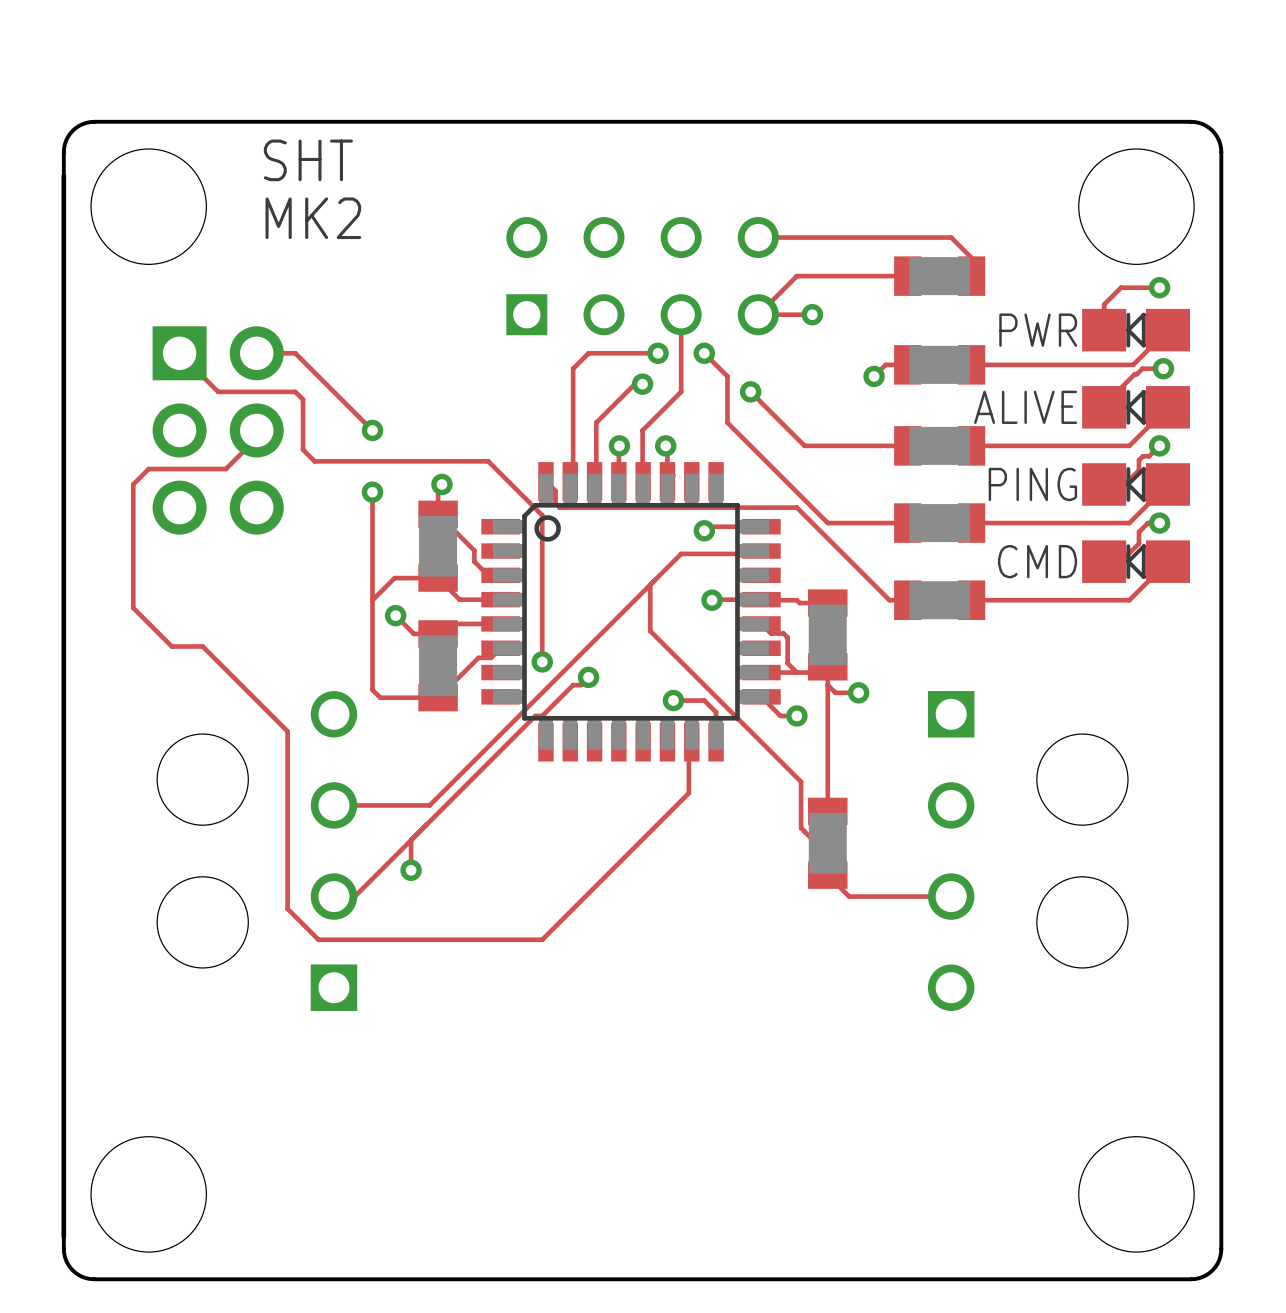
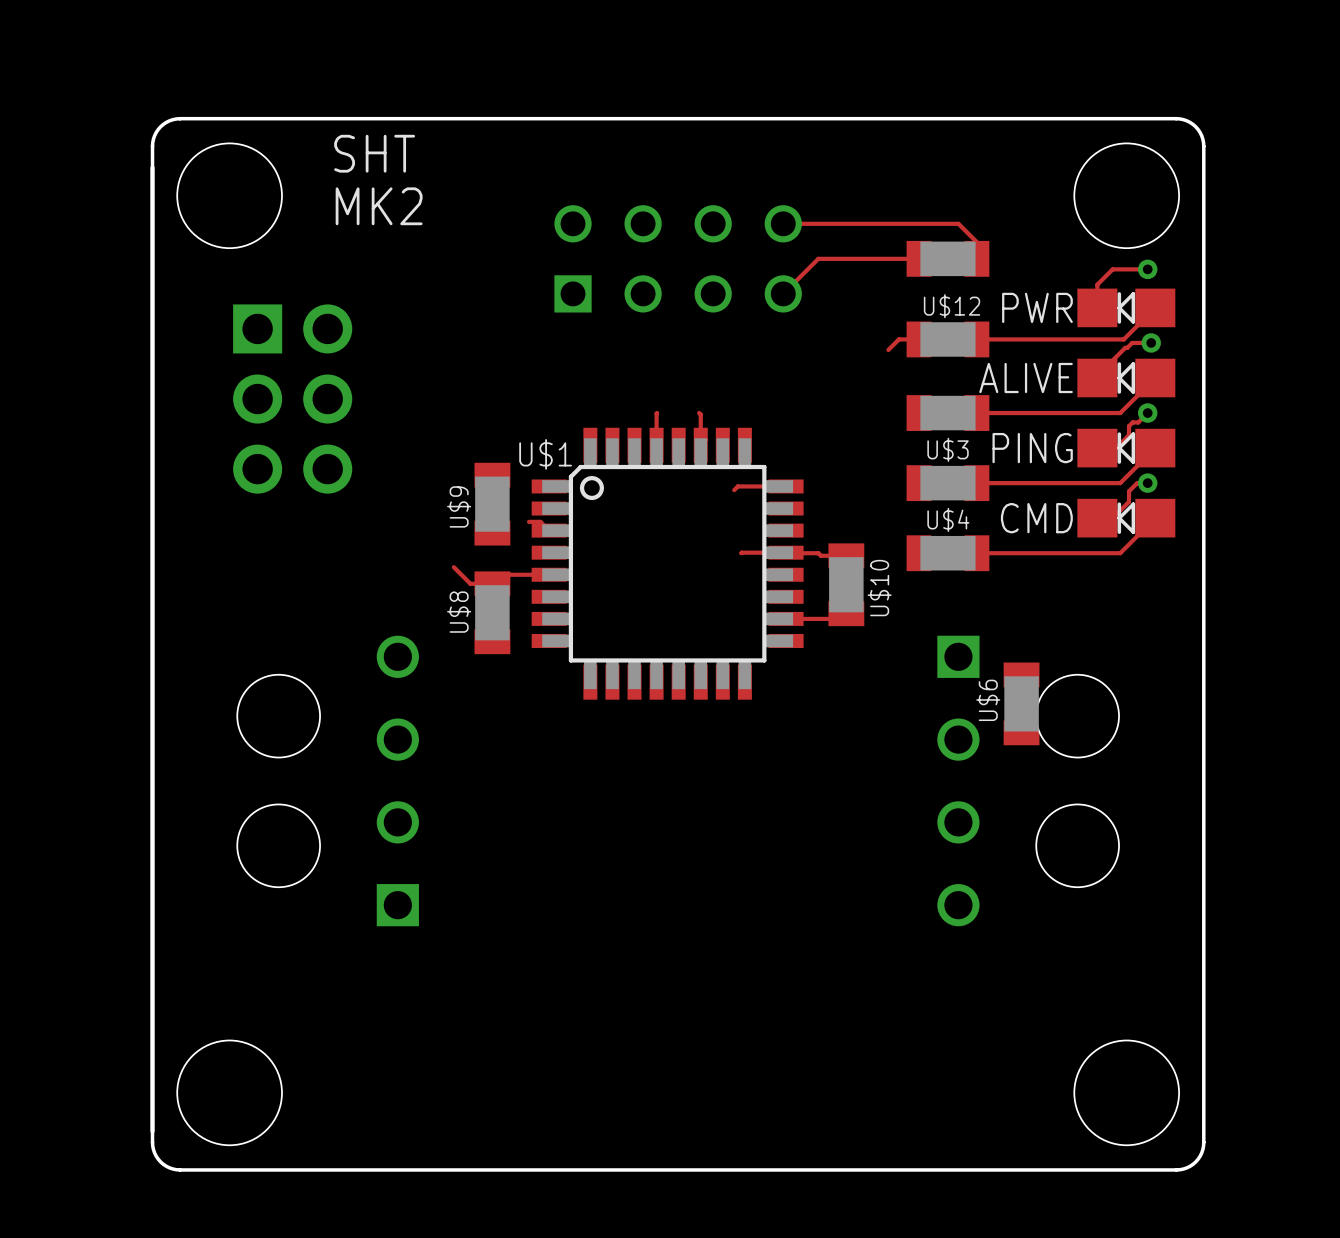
track: (681, 314) (681, 391) (642, 430) (643, 481) -> none
track: (758, 314) (812, 314) -> none
via: (812, 314) -> none
U$12 name: none -> U$12 (952, 306)
track: (179, 353) (218, 391) (295, 391) (303, 399) (303, 449) (314, 461) (488, 461) (542, 515) (542, 661) -> none
track: (256, 353) (295, 353) (372, 430) -> none
track: (658, 353) (588, 353) (573, 368) (573, 478) (570, 481) -> none
via: (658, 353) -> none
track: (704, 353) (727, 376) (727, 422) (827, 523) (907, 523) -> none
via: (704, 353) -> none
via: (874, 376) -> none
track: (642, 384) (634, 384) (596, 422) (596, 479) (594, 481) -> none
via: (642, 384) -> none
track: (750, 391) (804, 445) (907, 445) -> none
via: (750, 391) -> none
track: (256, 430) (256, 438) (225, 469) (148, 469) (133, 484) (133, 607) (171, 646) (202, 646) (287, 731) (287, 908) (318, 939) (542, 939) (688, 793) (688, 745) (691, 742) -> none
via: (372, 430) -> none
via: (619, 445) -> none
via: (665, 445) -> none
track: (545, 481) (555, 491) (555, 503) (559, 507) (796, 507) (889, 600) (907, 600) -> none
track: (441, 484) (438, 488) (438, 514) (474, 550) (474, 561) (488, 575) (500, 575) -> (529, 521) (540, 521) (549, 530)
via: (441, 484) -> none
U$3 name: none -> U$3 (948, 449)
U$1 name: none -> U$1 (545, 454)
track: (372, 492) (372, 689) (380, 697) (438, 697) (478, 657) (490, 657) (500, 648) -> none
via: (372, 492) -> none
via: (704, 530) -> none
U$9 name: none -> U$9 (459, 506)
track: (761, 551) (758, 553) (681, 553) (429, 805) (333, 805) -> none
U$4 name: none -> U$4 (948, 519)
track: (650, 584) (650, 631) (801, 781) (801, 827) (827, 854) (827, 875) (849, 896) (951, 896) -> none
track: (500, 599) (459, 599) (438, 578) (394, 578) (372, 600) -> none
via: (712, 600) -> none
via: (395, 615) -> none
track: (761, 623) (771, 633) (783, 633) (787, 637) (787, 663) (796, 672) -> none
U$10 name: none -> U$10 (879, 588)
via: (542, 661) -> none
U$8 name: none -> U$8 (459, 612)
track: (826, 668) (827, 811) -> none
track: (588, 677) (580, 685) (573, 685) (542, 715) (535, 715) (354, 896) (333, 896) -> none
via: (588, 677) -> none
track: (827, 685) (835, 692) (858, 692) -> none
via: (858, 692) -> none
track: (761, 696) (780, 715) (796, 715) -> none
track: (673, 700) (704, 700) (716, 712) (716, 742) -> none
via: (673, 700) -> none
via: (796, 715) -> none
U$6: none -> (1021, 703)
track: (411, 840) (411, 870) -> none
part: (827, 843) -> none
via: (411, 870) -> none

